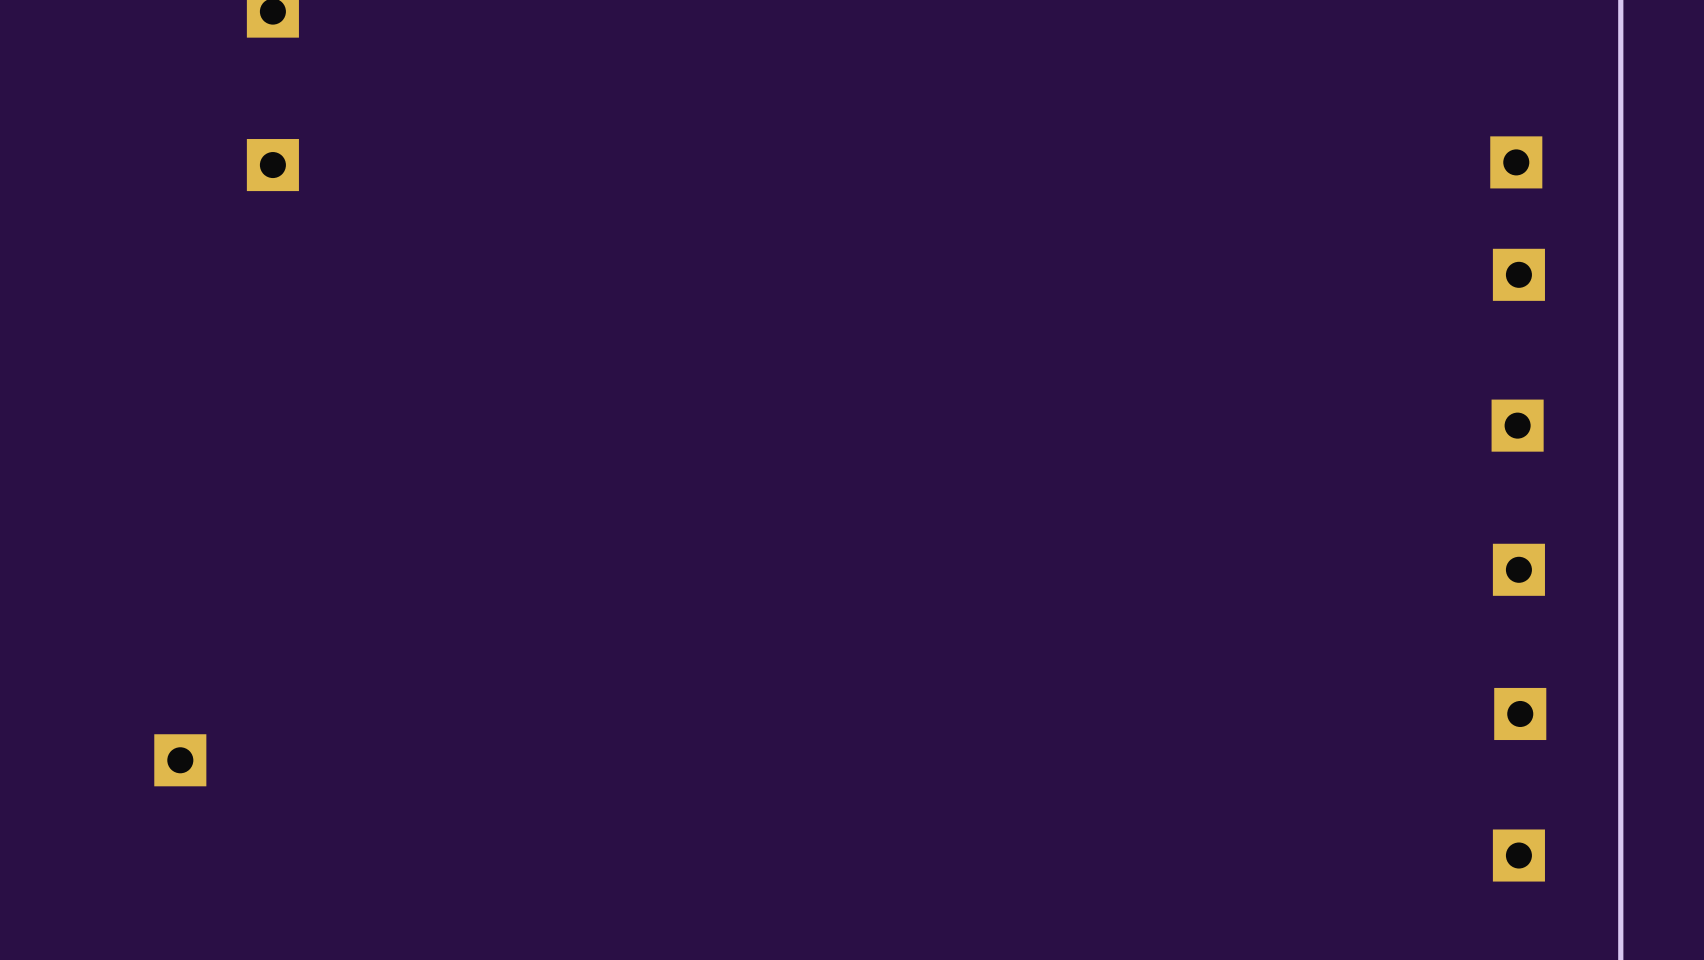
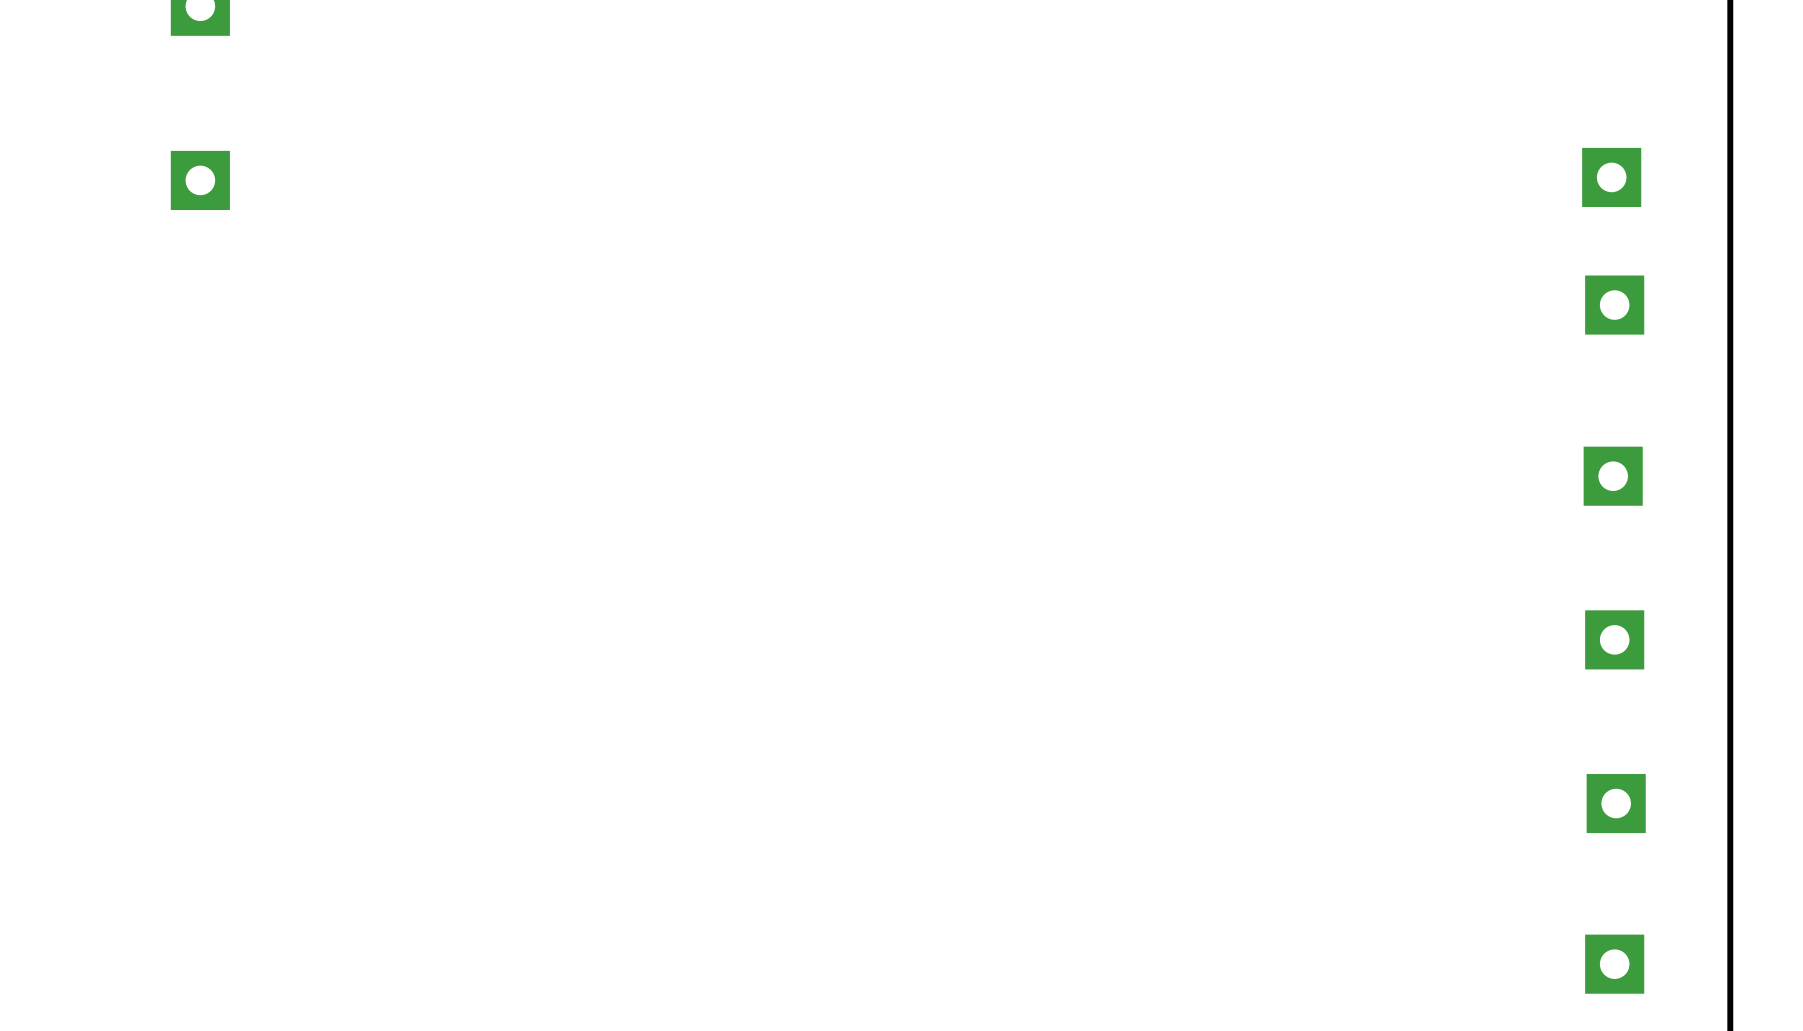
part: (180, 760) -> none

